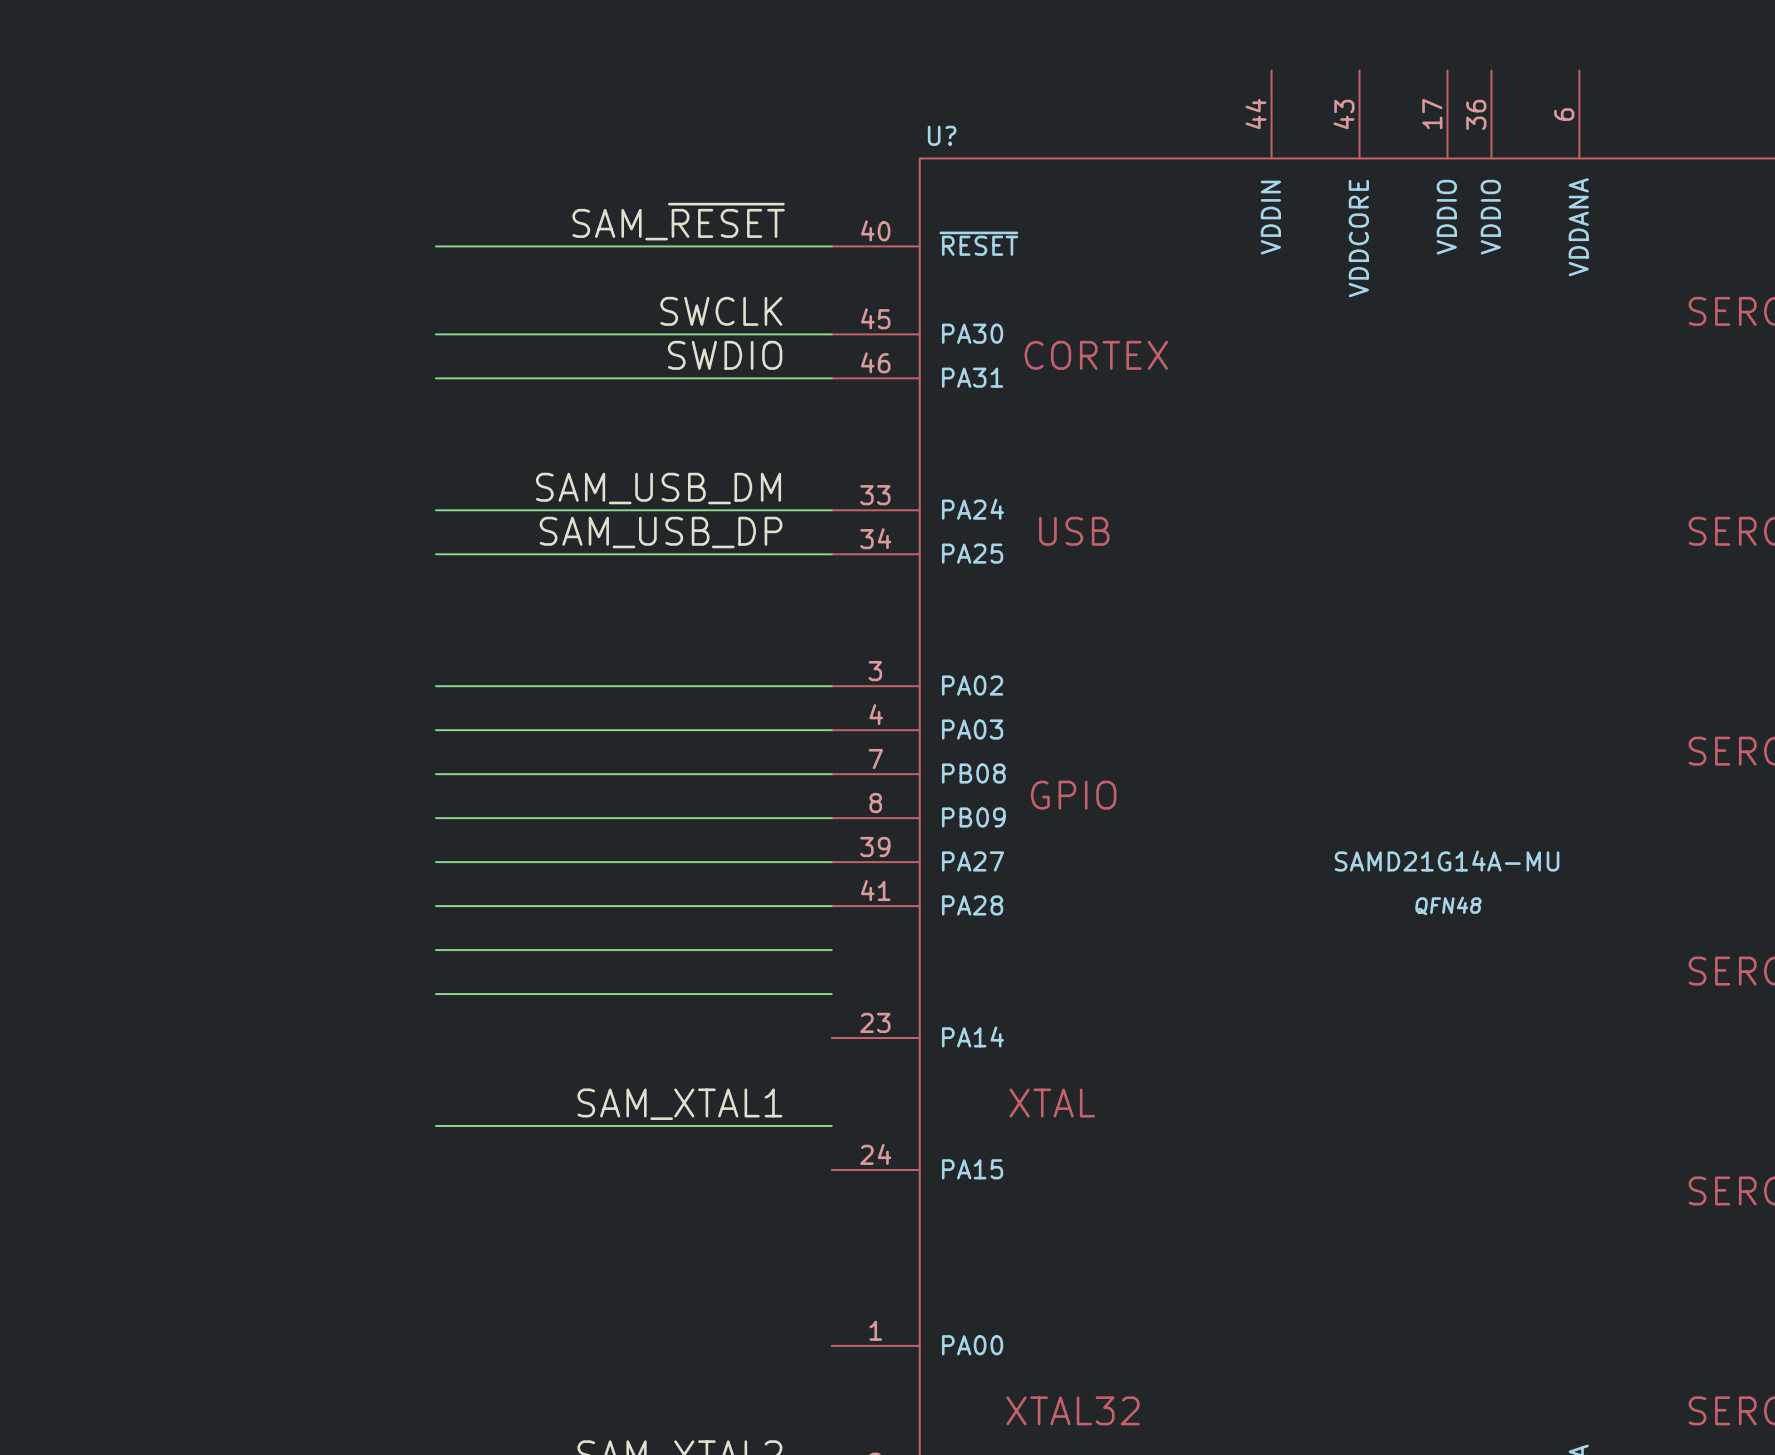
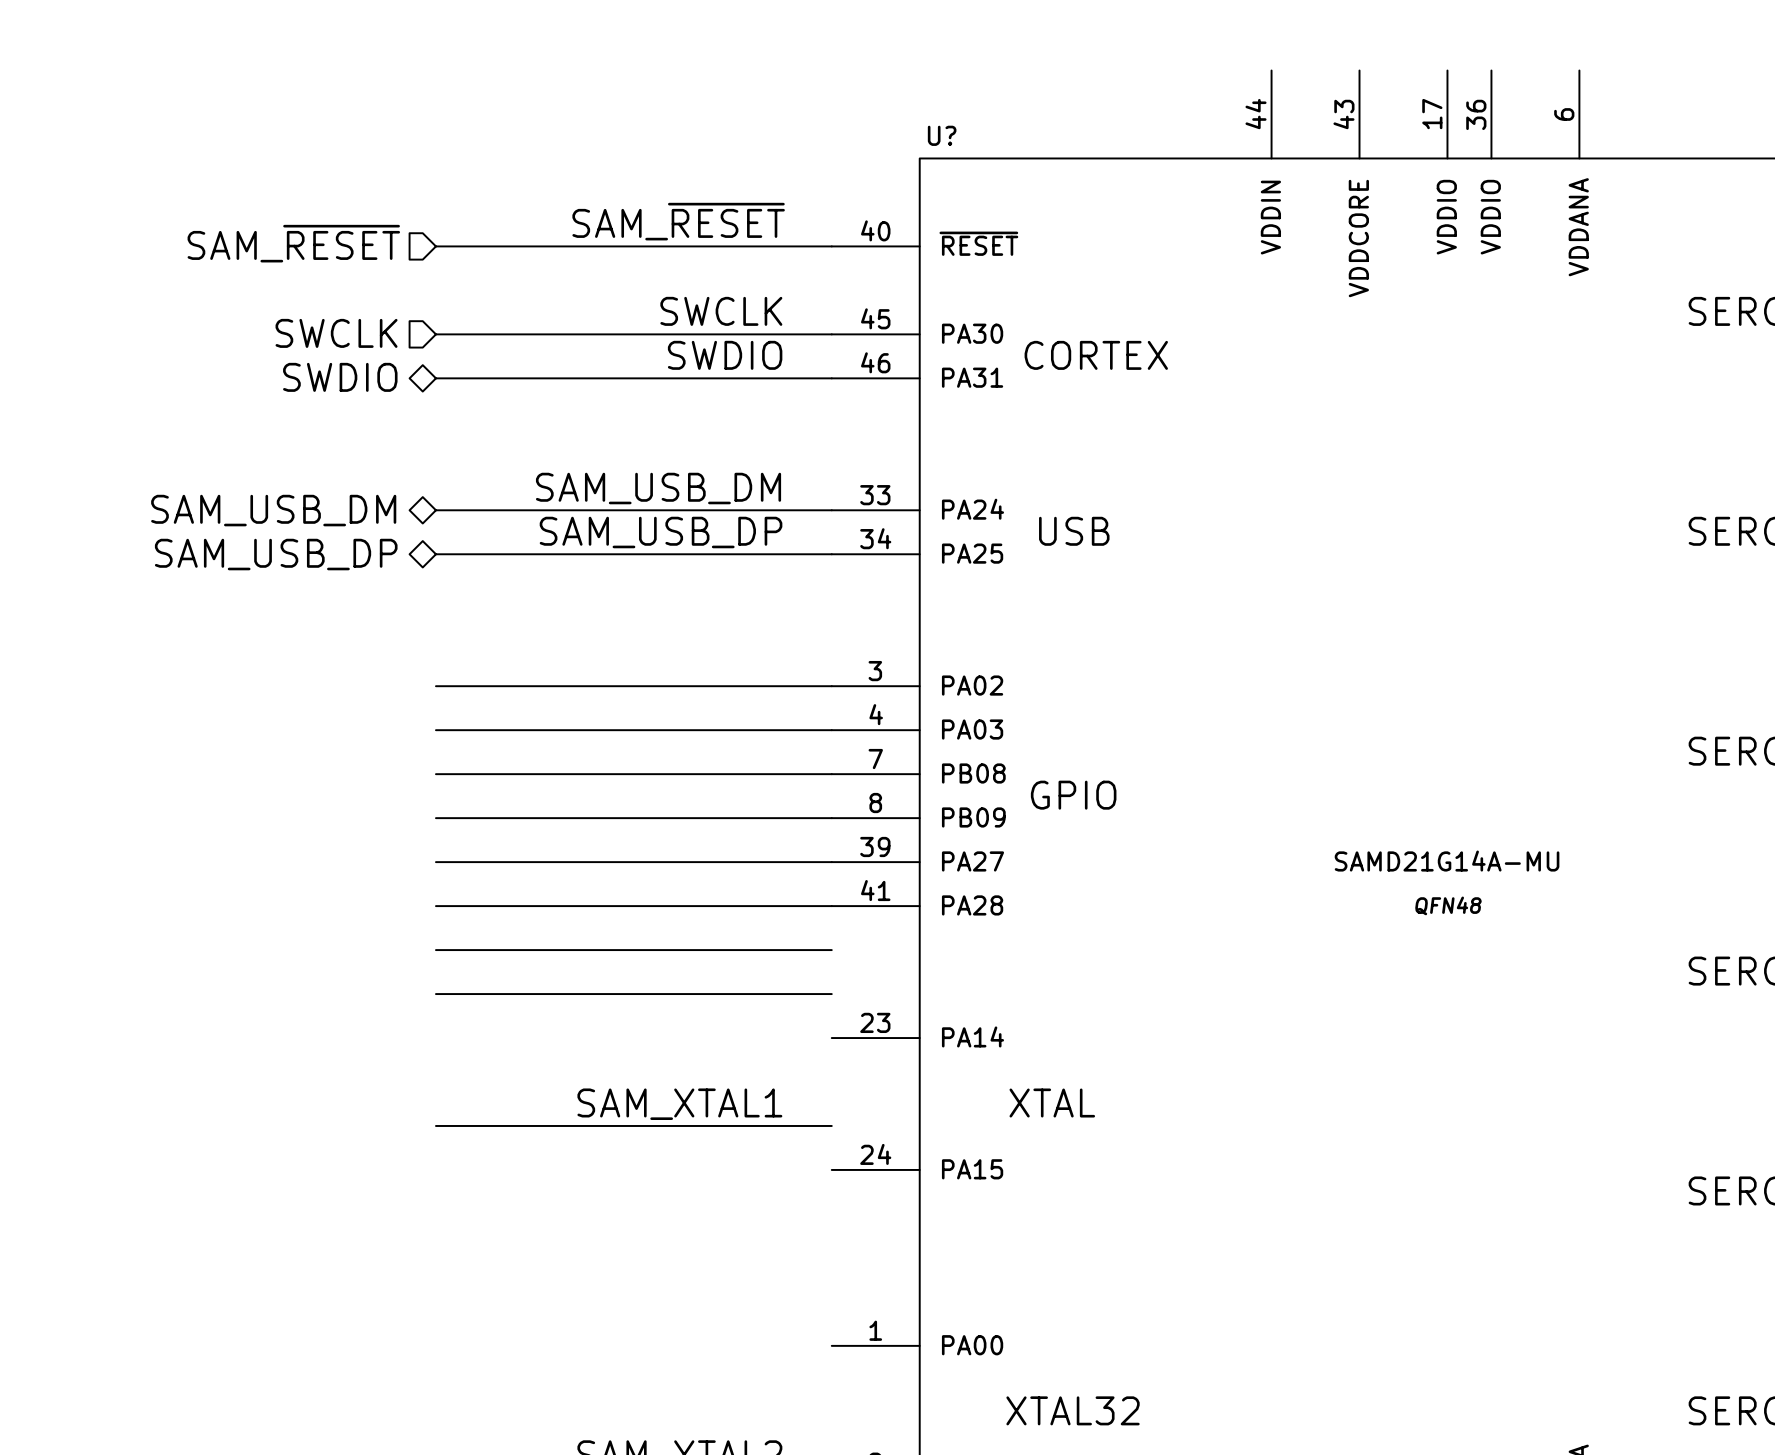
hierarchical label: none -> SAM_~{RESET} (293, 243)
hierarchical label: none -> SWCLK (336, 333)
hierarchical label: none -> SWDIO (340, 377)
hierarchical label: none -> SAM_USB_DM (273, 510)
hierarchical label: none -> SAM_USB_DP (276, 554)

